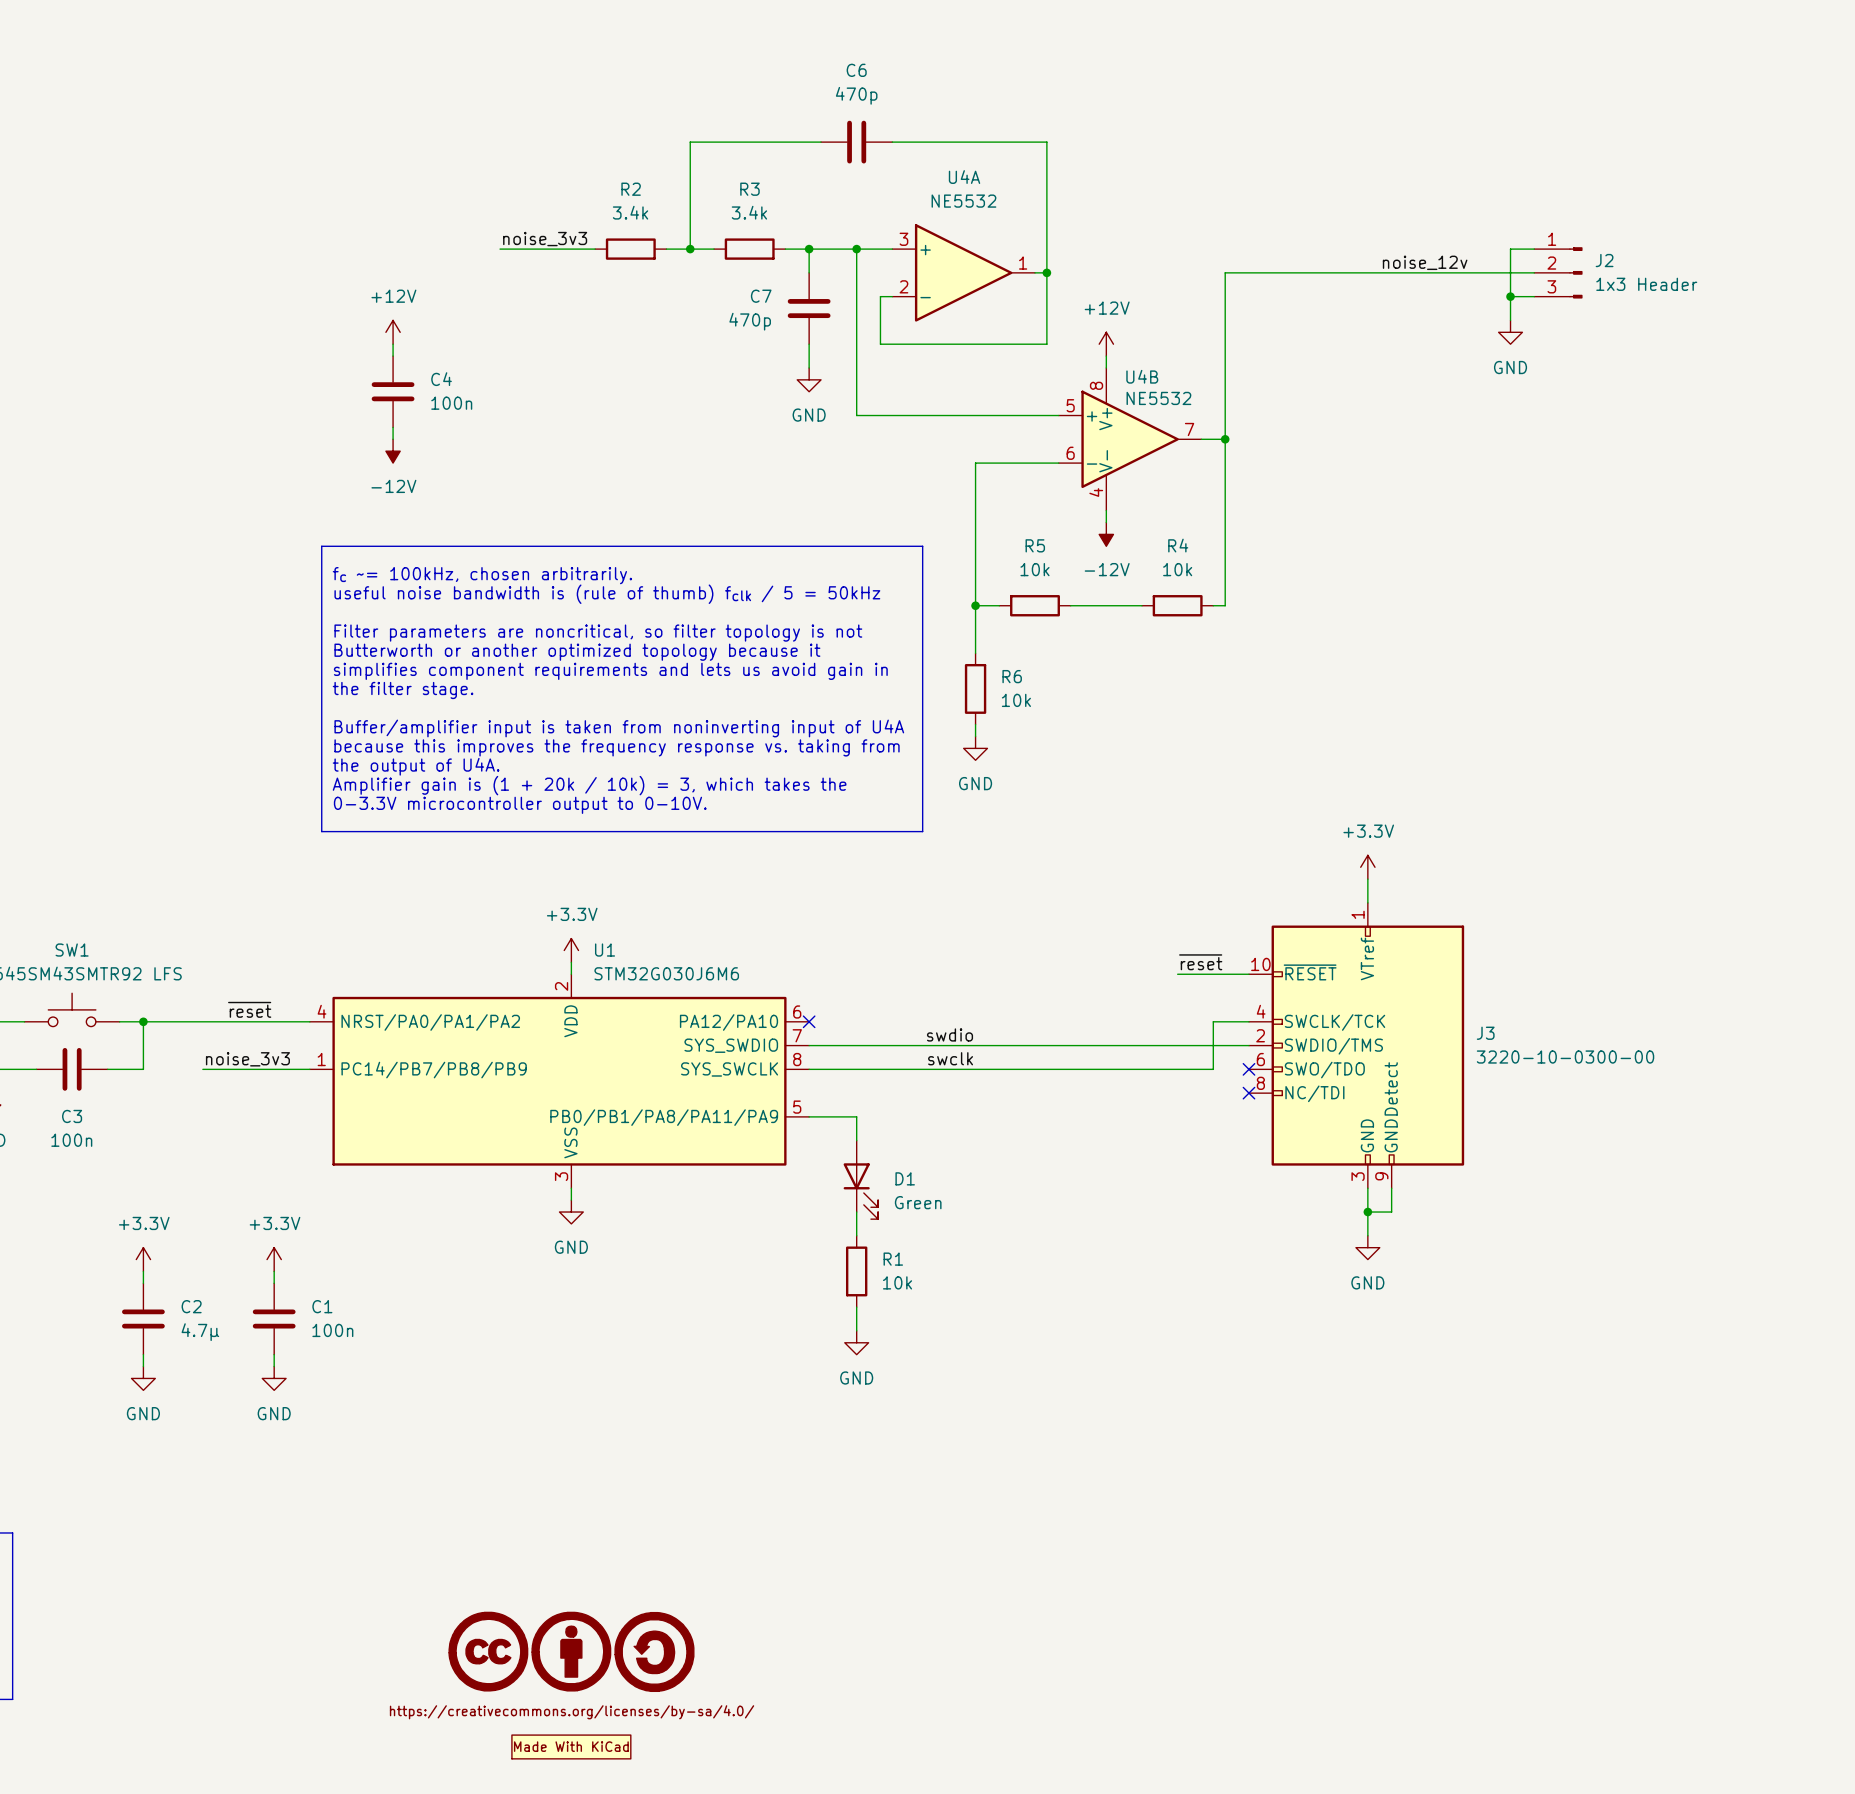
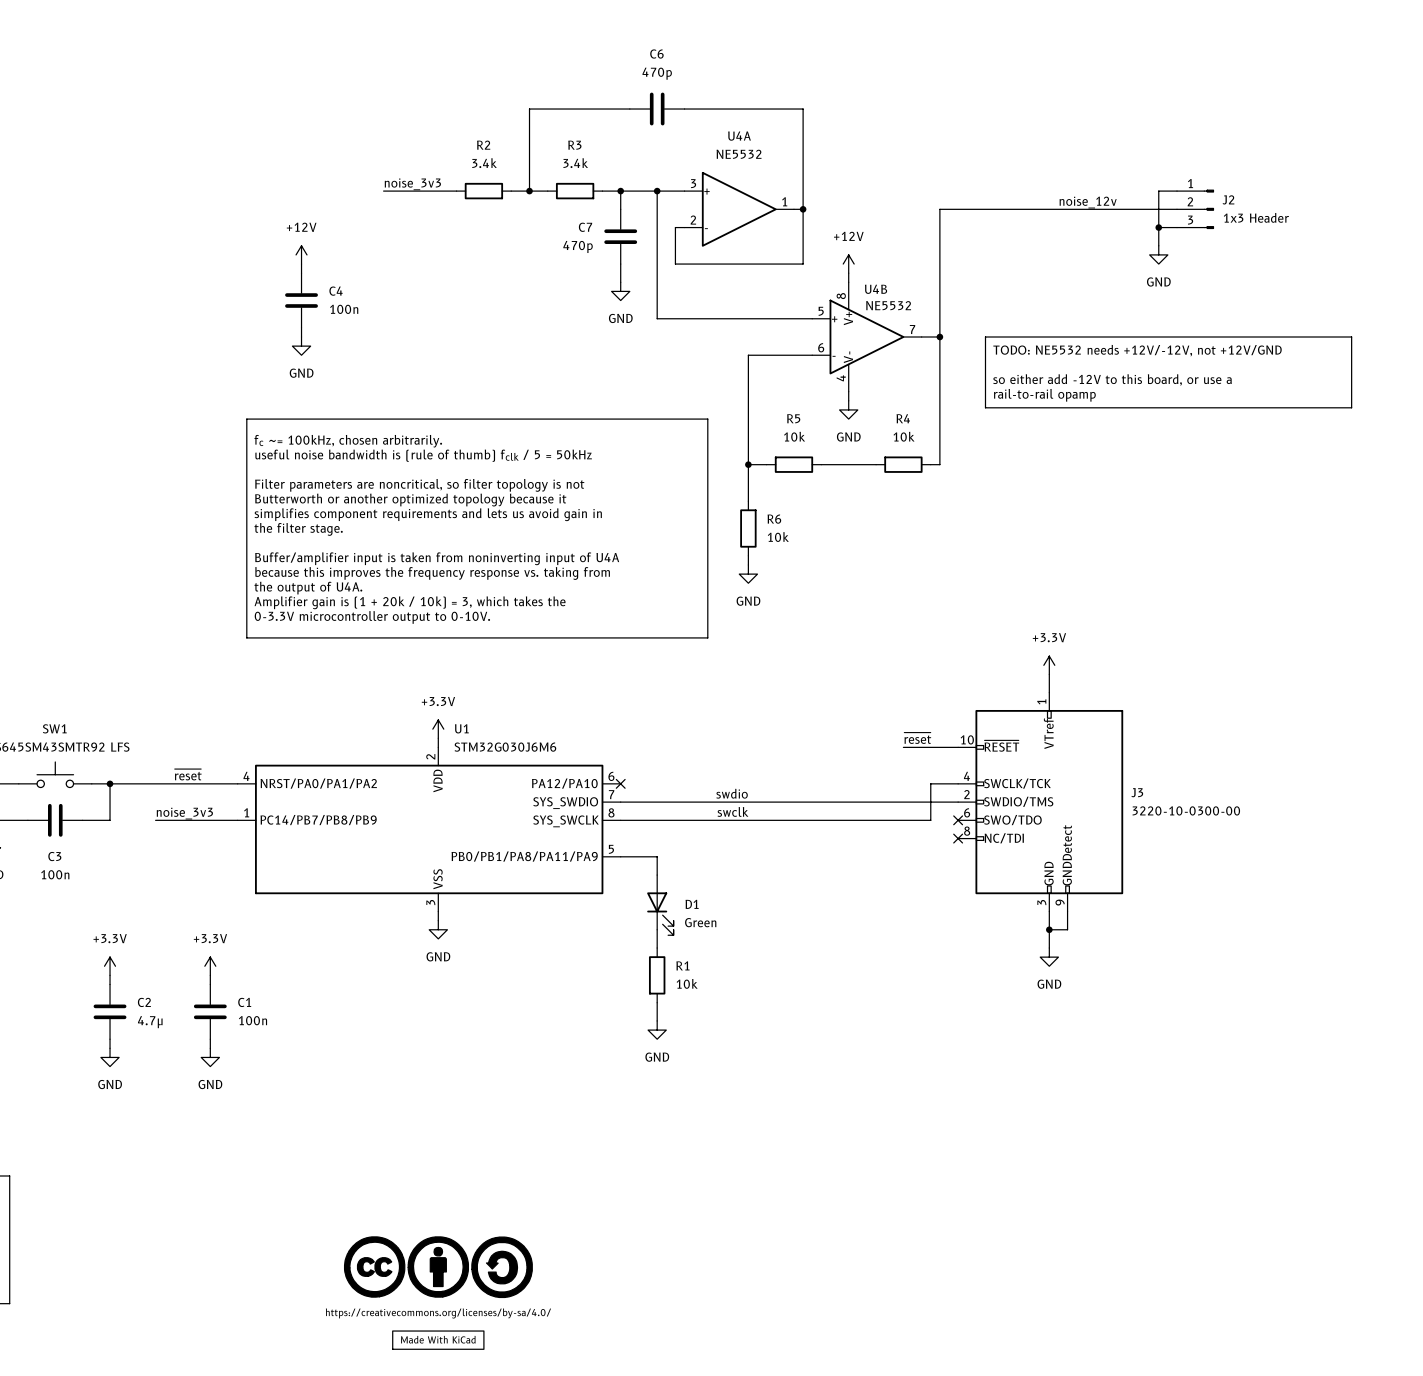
line: none -> (985, 337) (1351, 337) (1351, 407) (985, 407) (985, 337)
power symbol: -12V (393, 451) -> GND (301, 346)
text: none -> TODO: NE5532 needs +12V/-12V, not +12V/GND (1137, 350)
text: none -> so either add -12V to this board, or use a (1112, 380)
text: none -> rail-to-rail opamp (1044, 395)
power symbol: -12V (1106, 534) -> GND (848, 409)

